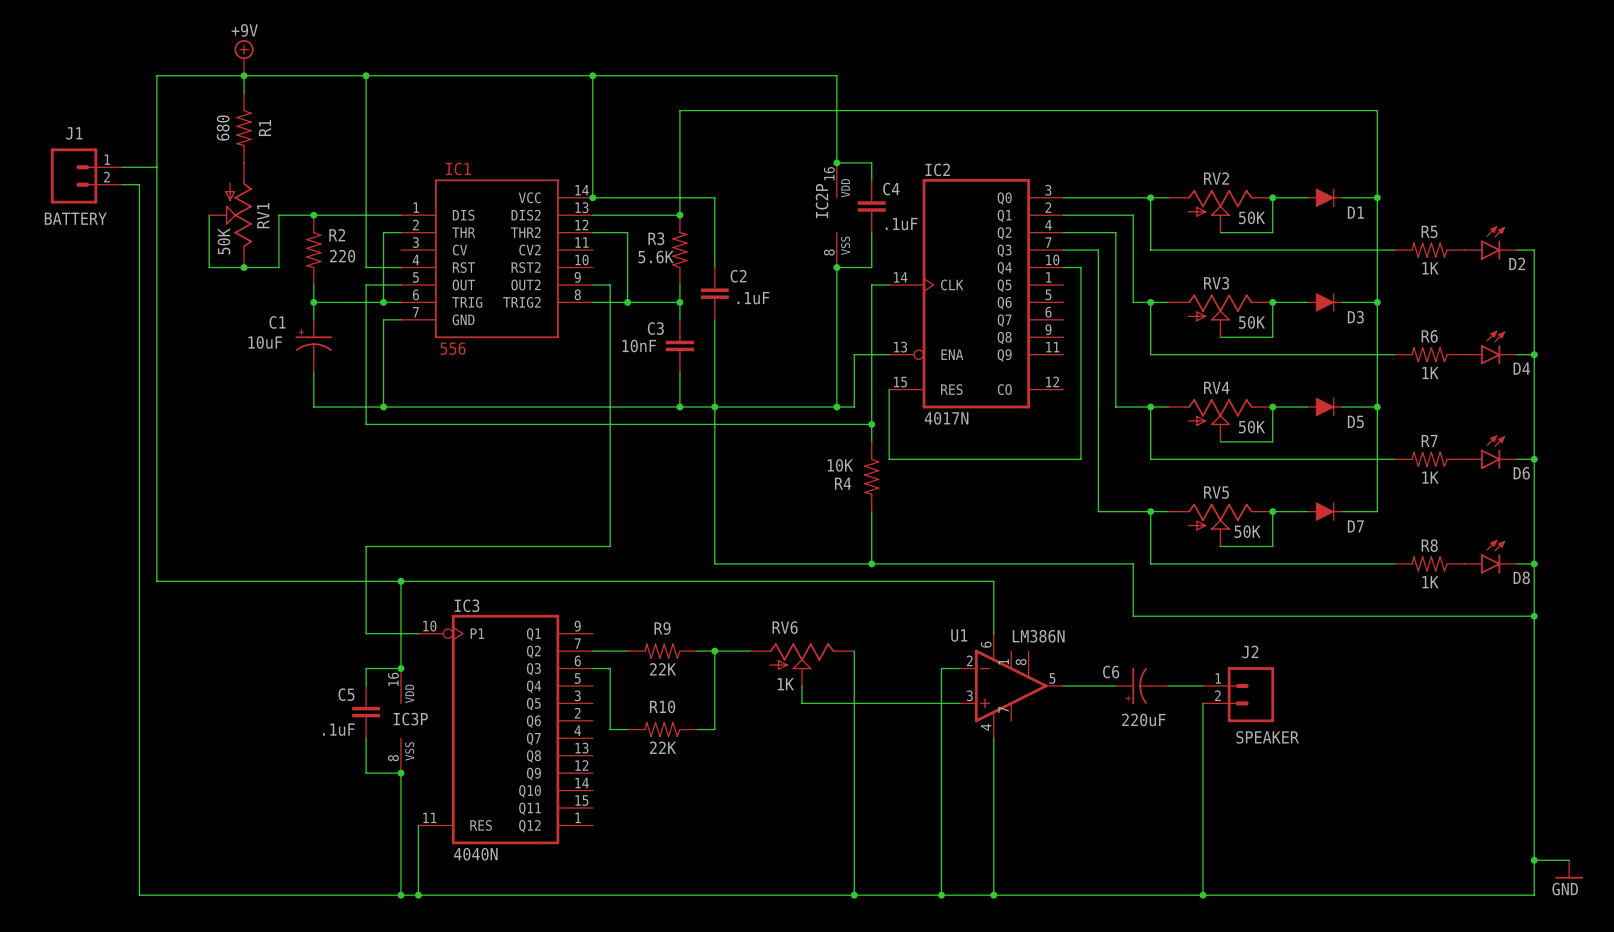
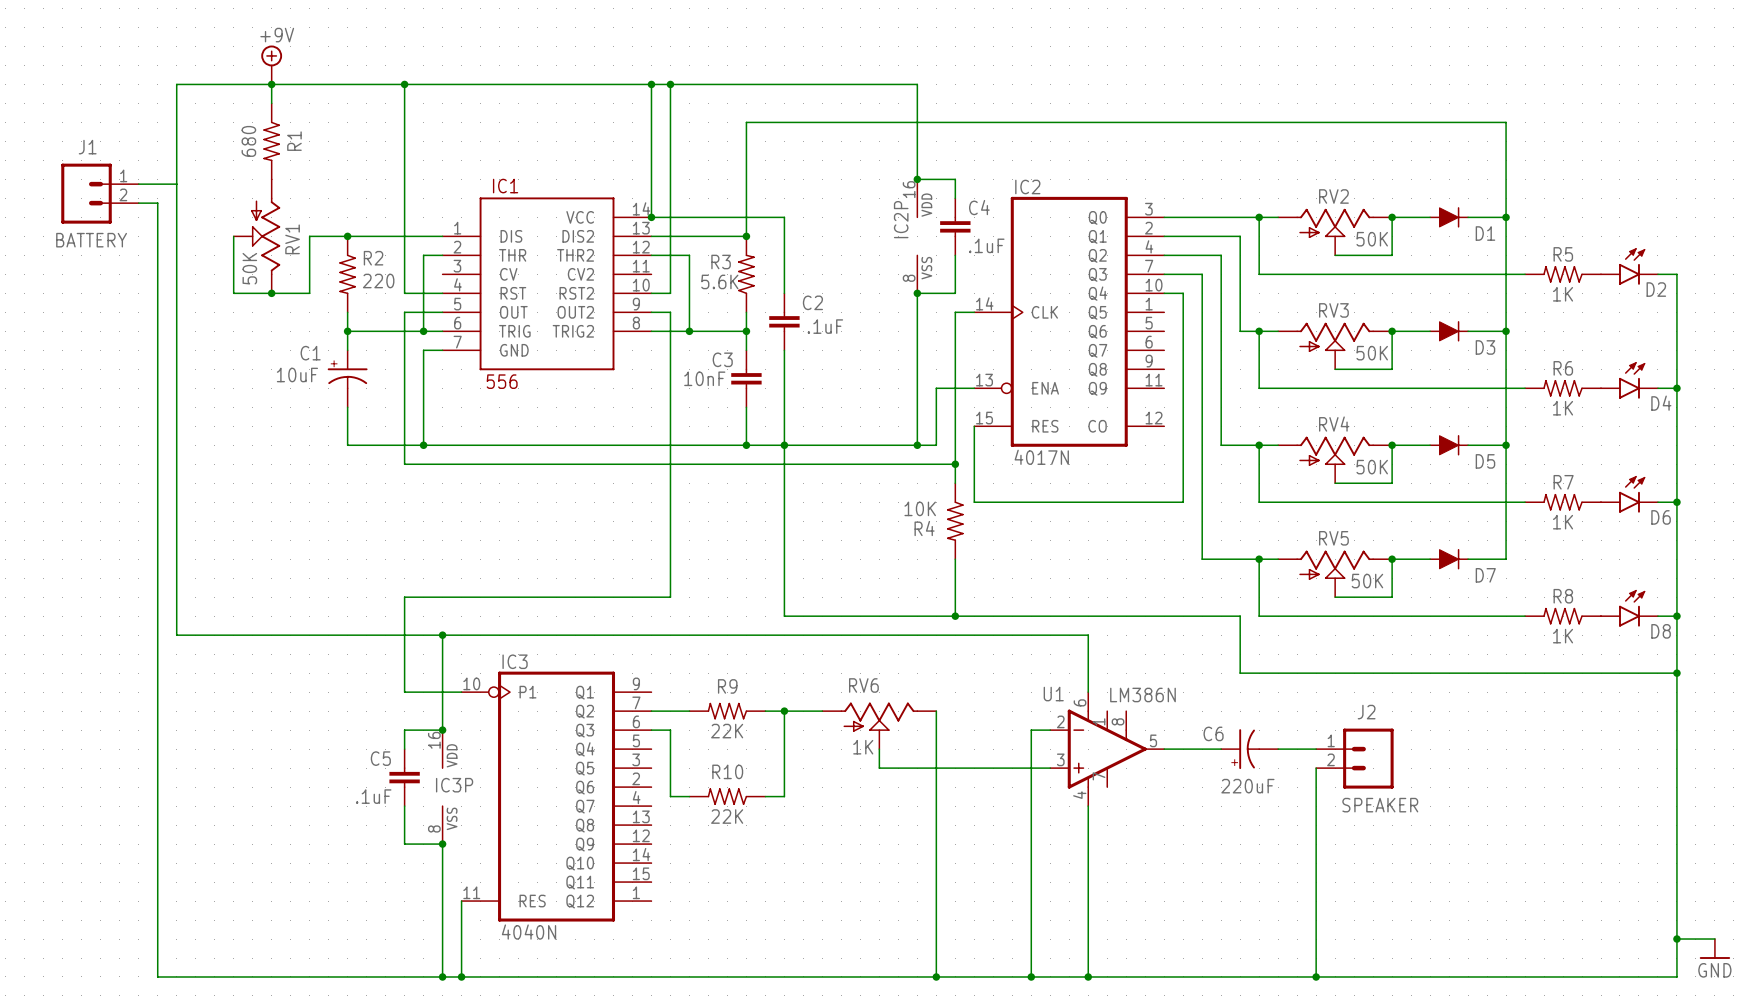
wire: none -> (670, 84) (670, 293) (651, 293)
junction: none -> (670, 84)

